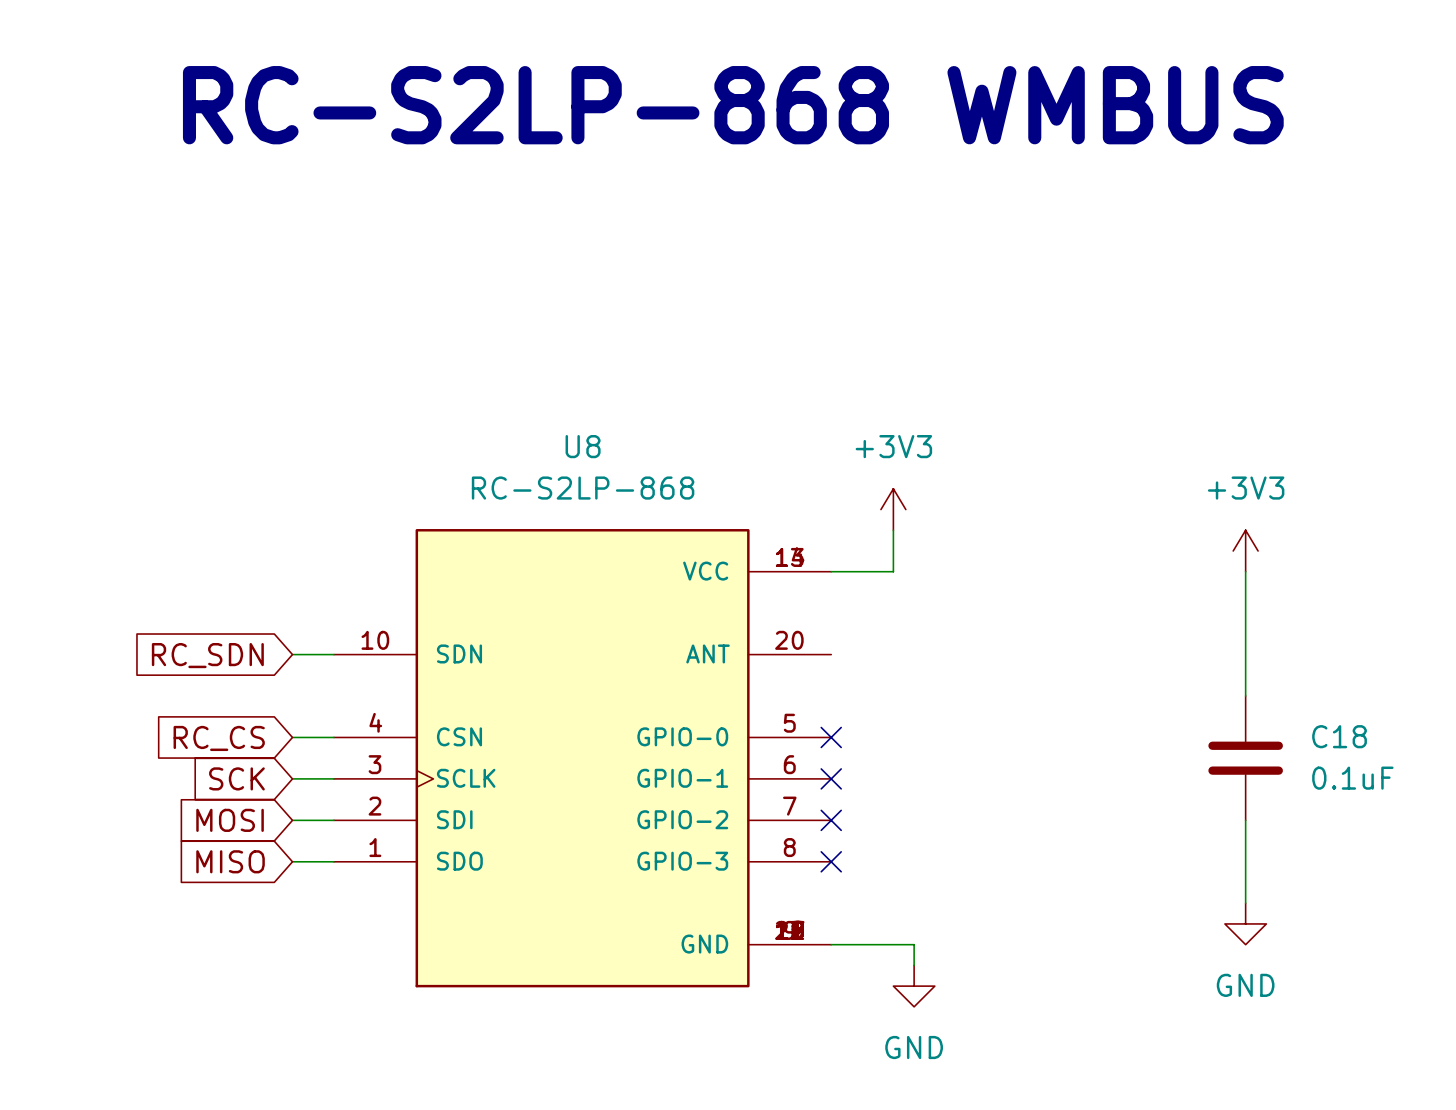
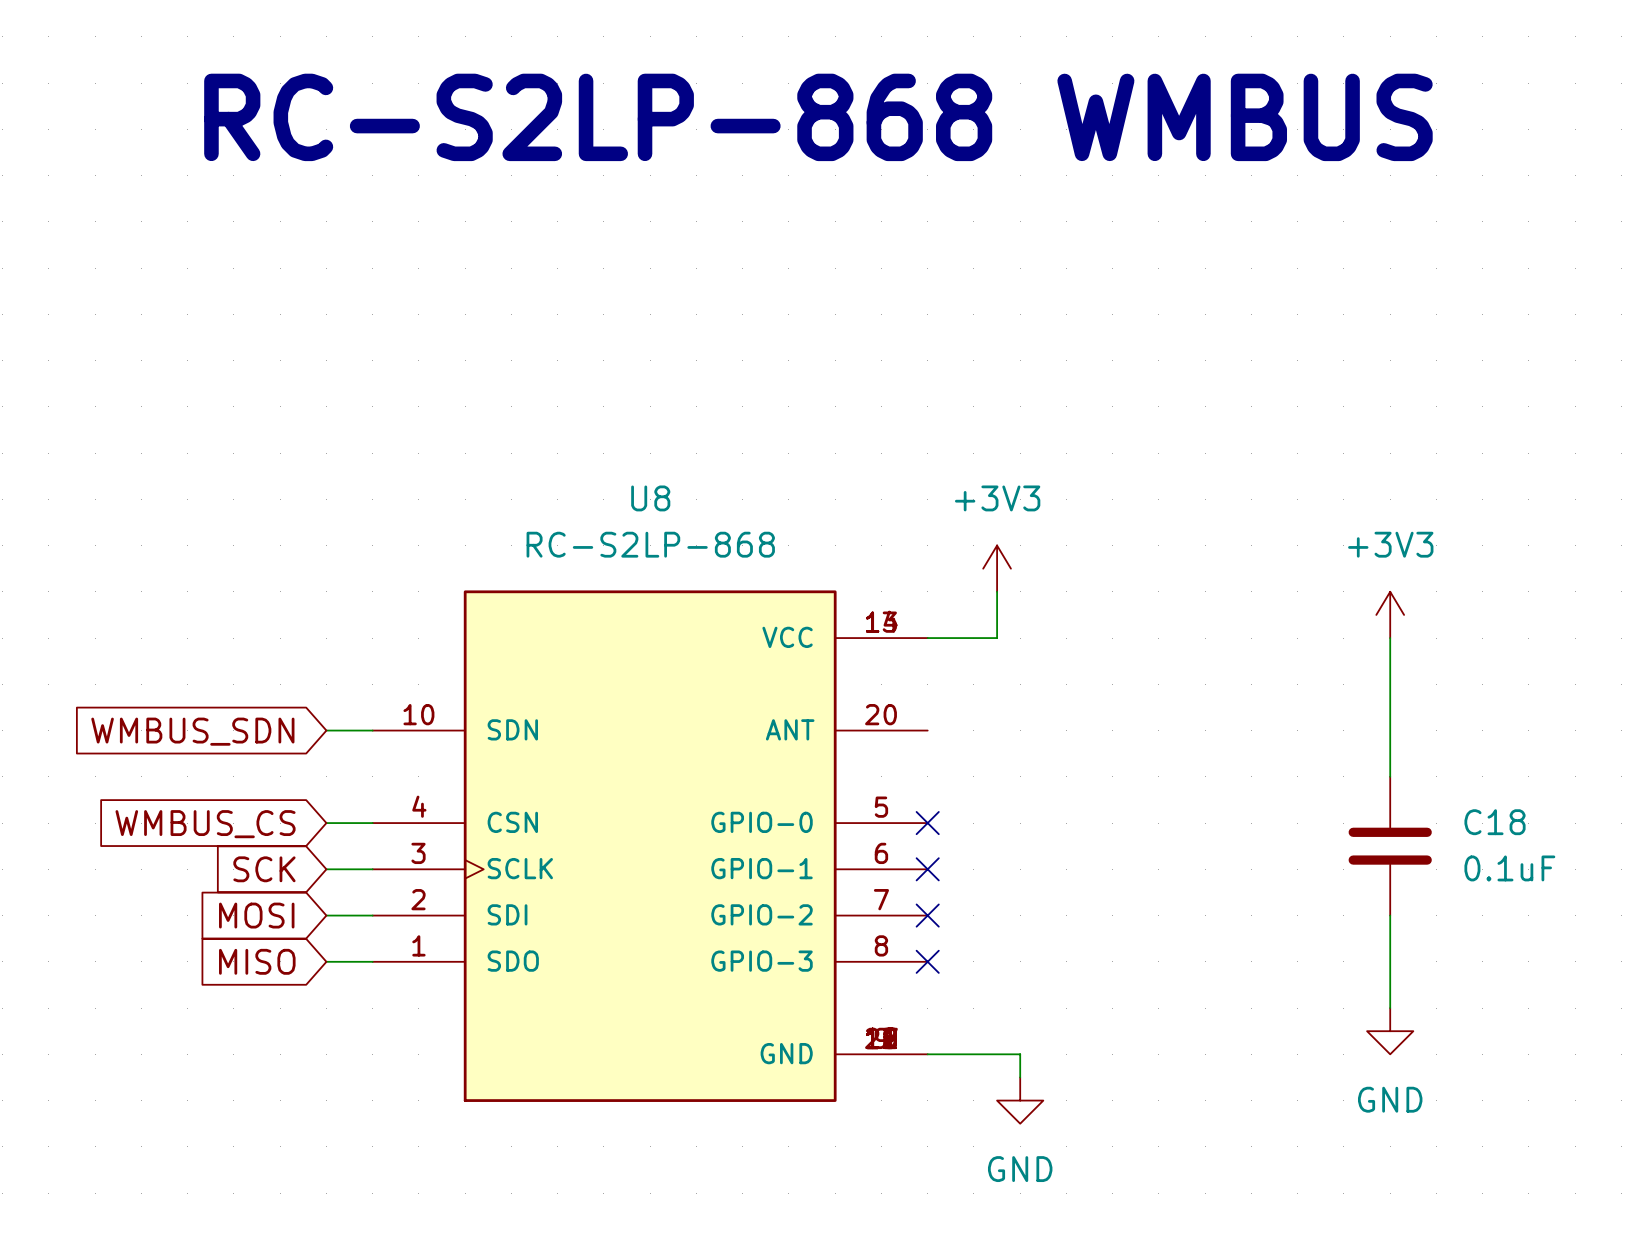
global label: RC_SDN (207, 655) -> WMBUS_SDN (192, 731)
global label: RC_CS (219, 738) -> WMBUS_CS (205, 824)

